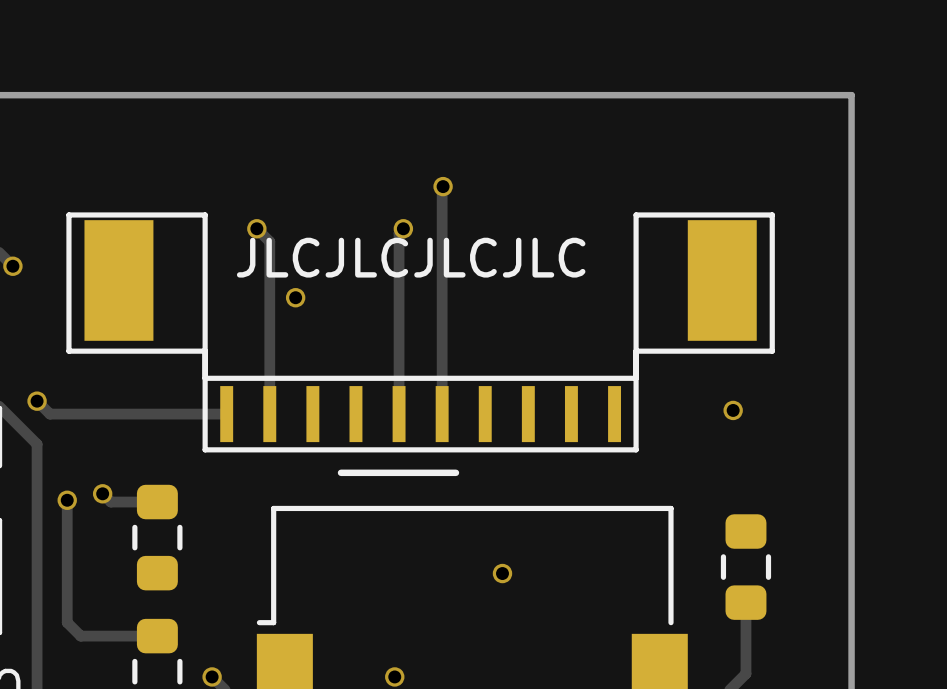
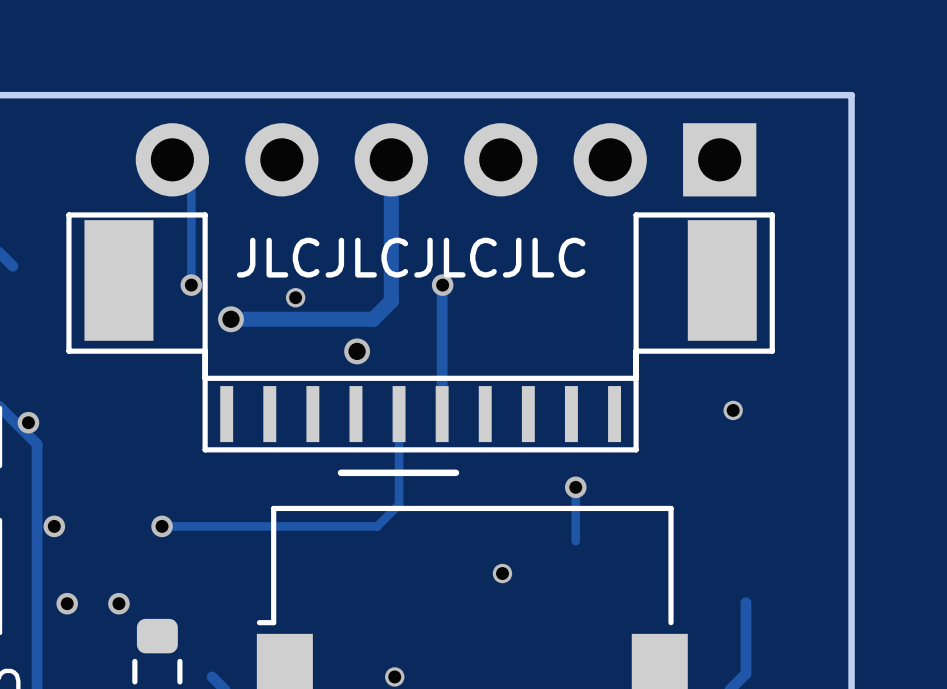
track: none -> (391, 159) (391, 301) (373, 319) (230, 319)
part: none -> (446, 159)
track: none -> (191, 178) (191, 285)
track: (443, 186) (442, 285) -> none
via: (443, 186) -> none
track: (256, 228) (269, 241) (269, 414) -> none
via: (256, 228) -> none
track: (403, 228) (399, 233) (399, 394) -> none
via: (403, 228) -> none
via: (12, 266) -> none
via: none -> (191, 285)
via: none -> (442, 285)
via: none -> (230, 319)
via: none -> (357, 351)
track: (37, 401) (50, 414) (226, 414) -> none
via: (37, 401) -> none
track: none -> (399, 414) (399, 504) (377, 526) (162, 526)
via: none -> (28, 422)
track: none -> (575, 487) (575, 541)
via: none -> (575, 487)
track: (102, 493) (110, 502) (157, 502) -> none
via: (102, 493) -> none
track: (67, 500) (67, 622) (80, 636) (157, 636) -> none
via: (67, 500) -> none
via: none -> (54, 526)
via: none -> (162, 526)
part: (157, 537) -> none
part: (745, 567) -> none
via: none -> (67, 603)
via: none -> (118, 603)
via: (212, 676) -> none

